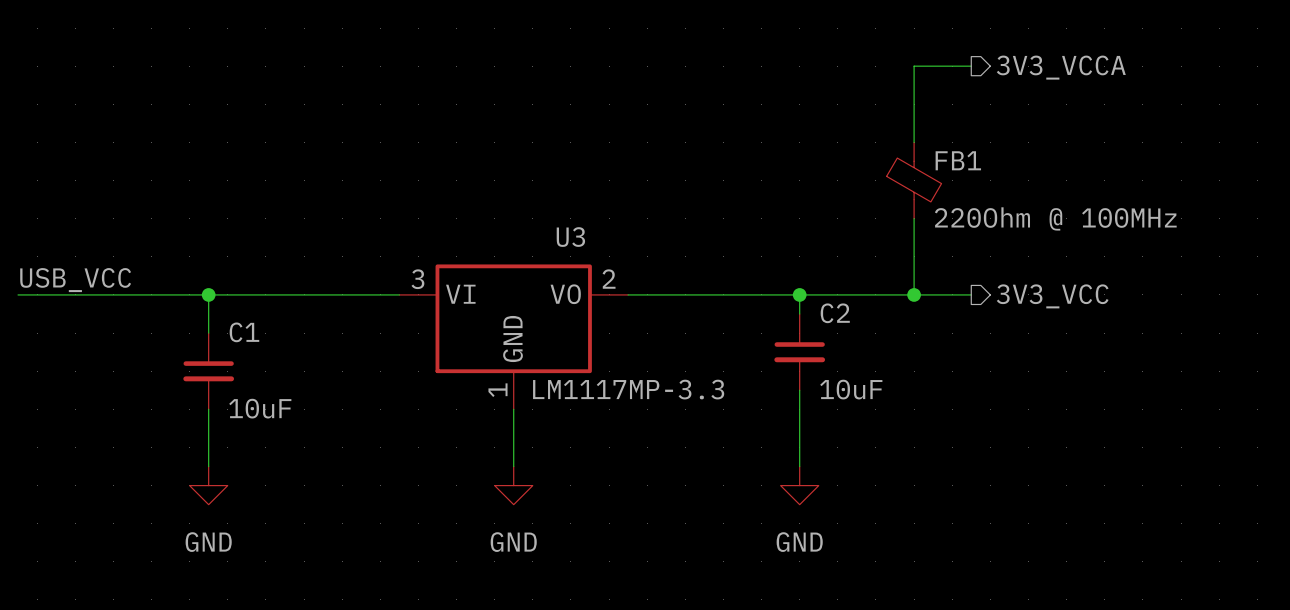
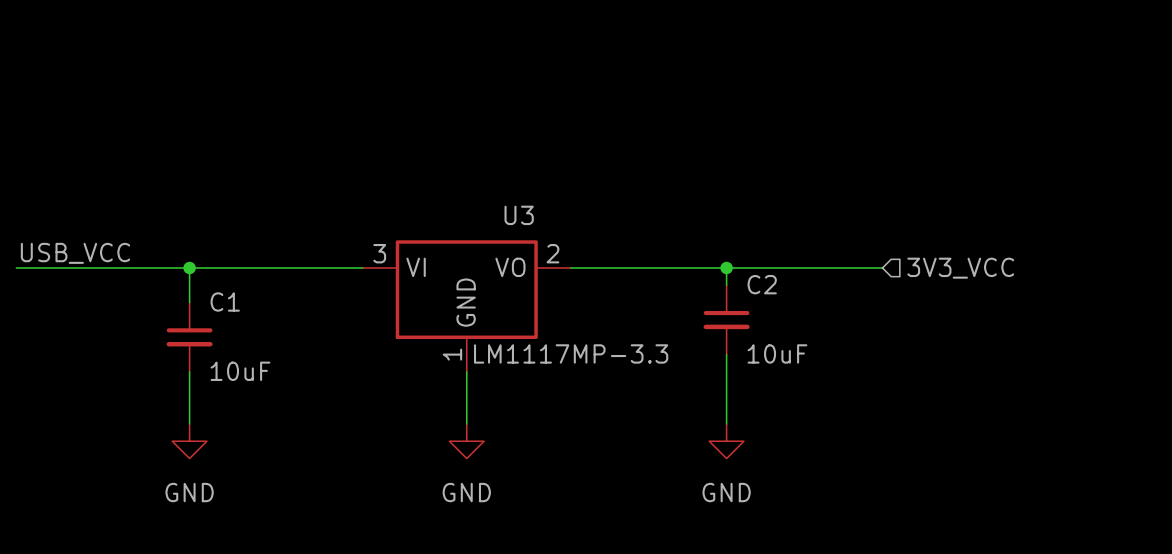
wire: (971, 66) (914, 66) (914, 142) -> none
hierarchical label: 3V3_VCCA (1061, 67) -> none
FB1: 220Ohm @ 100MHz (914, 180) -> none
wire: (914, 218) (914, 294) -> none
junction: (914, 294) -> none
hierarchical label shape: output (1052, 296) -> input (960, 268)

